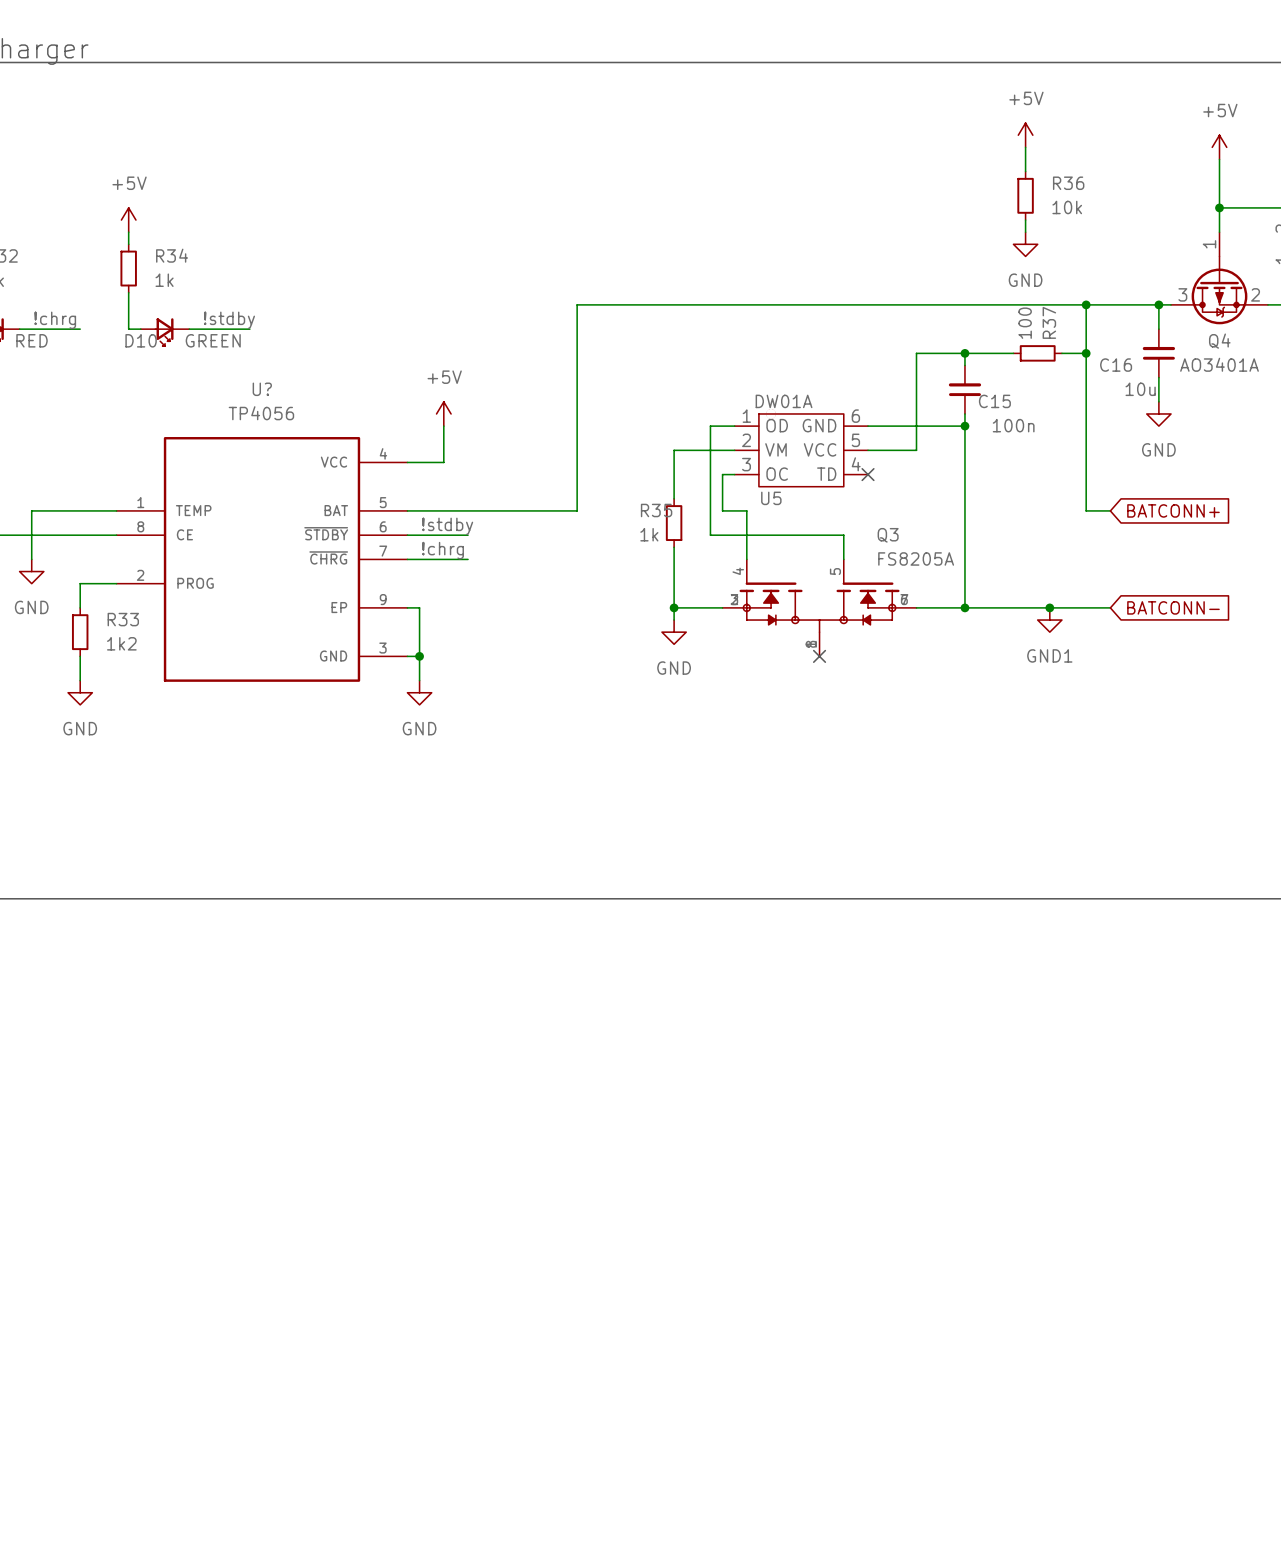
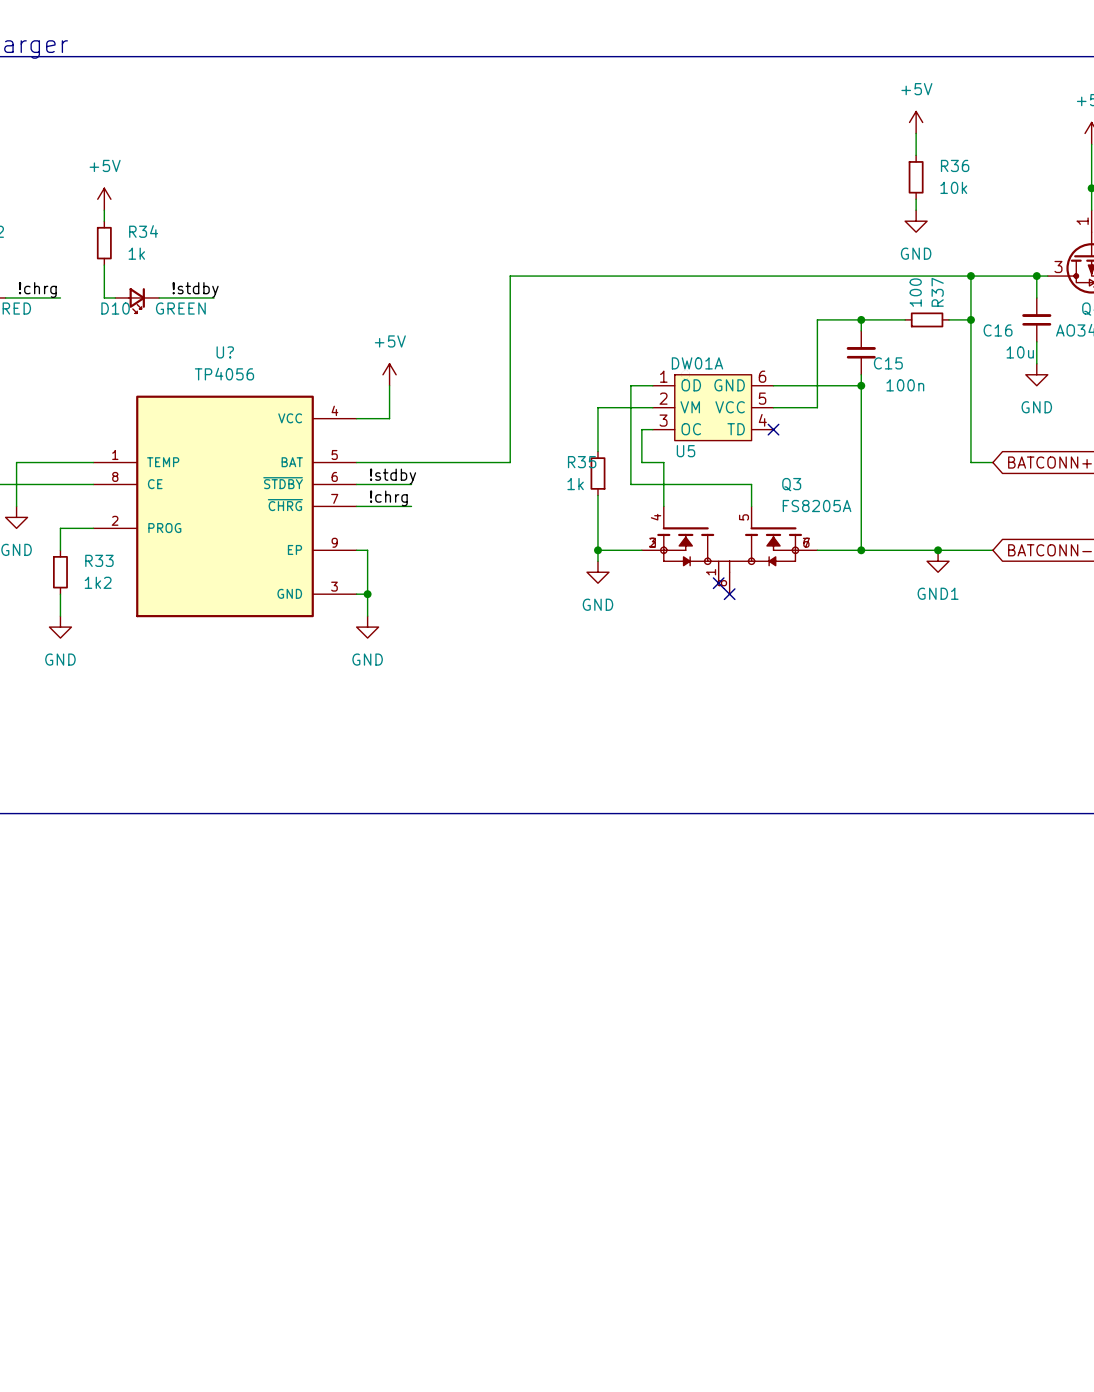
Q3 symbol: [722, 559, 917, 657] -> [641, 506, 818, 595]
no-connect mark: none -> (718, 583)

